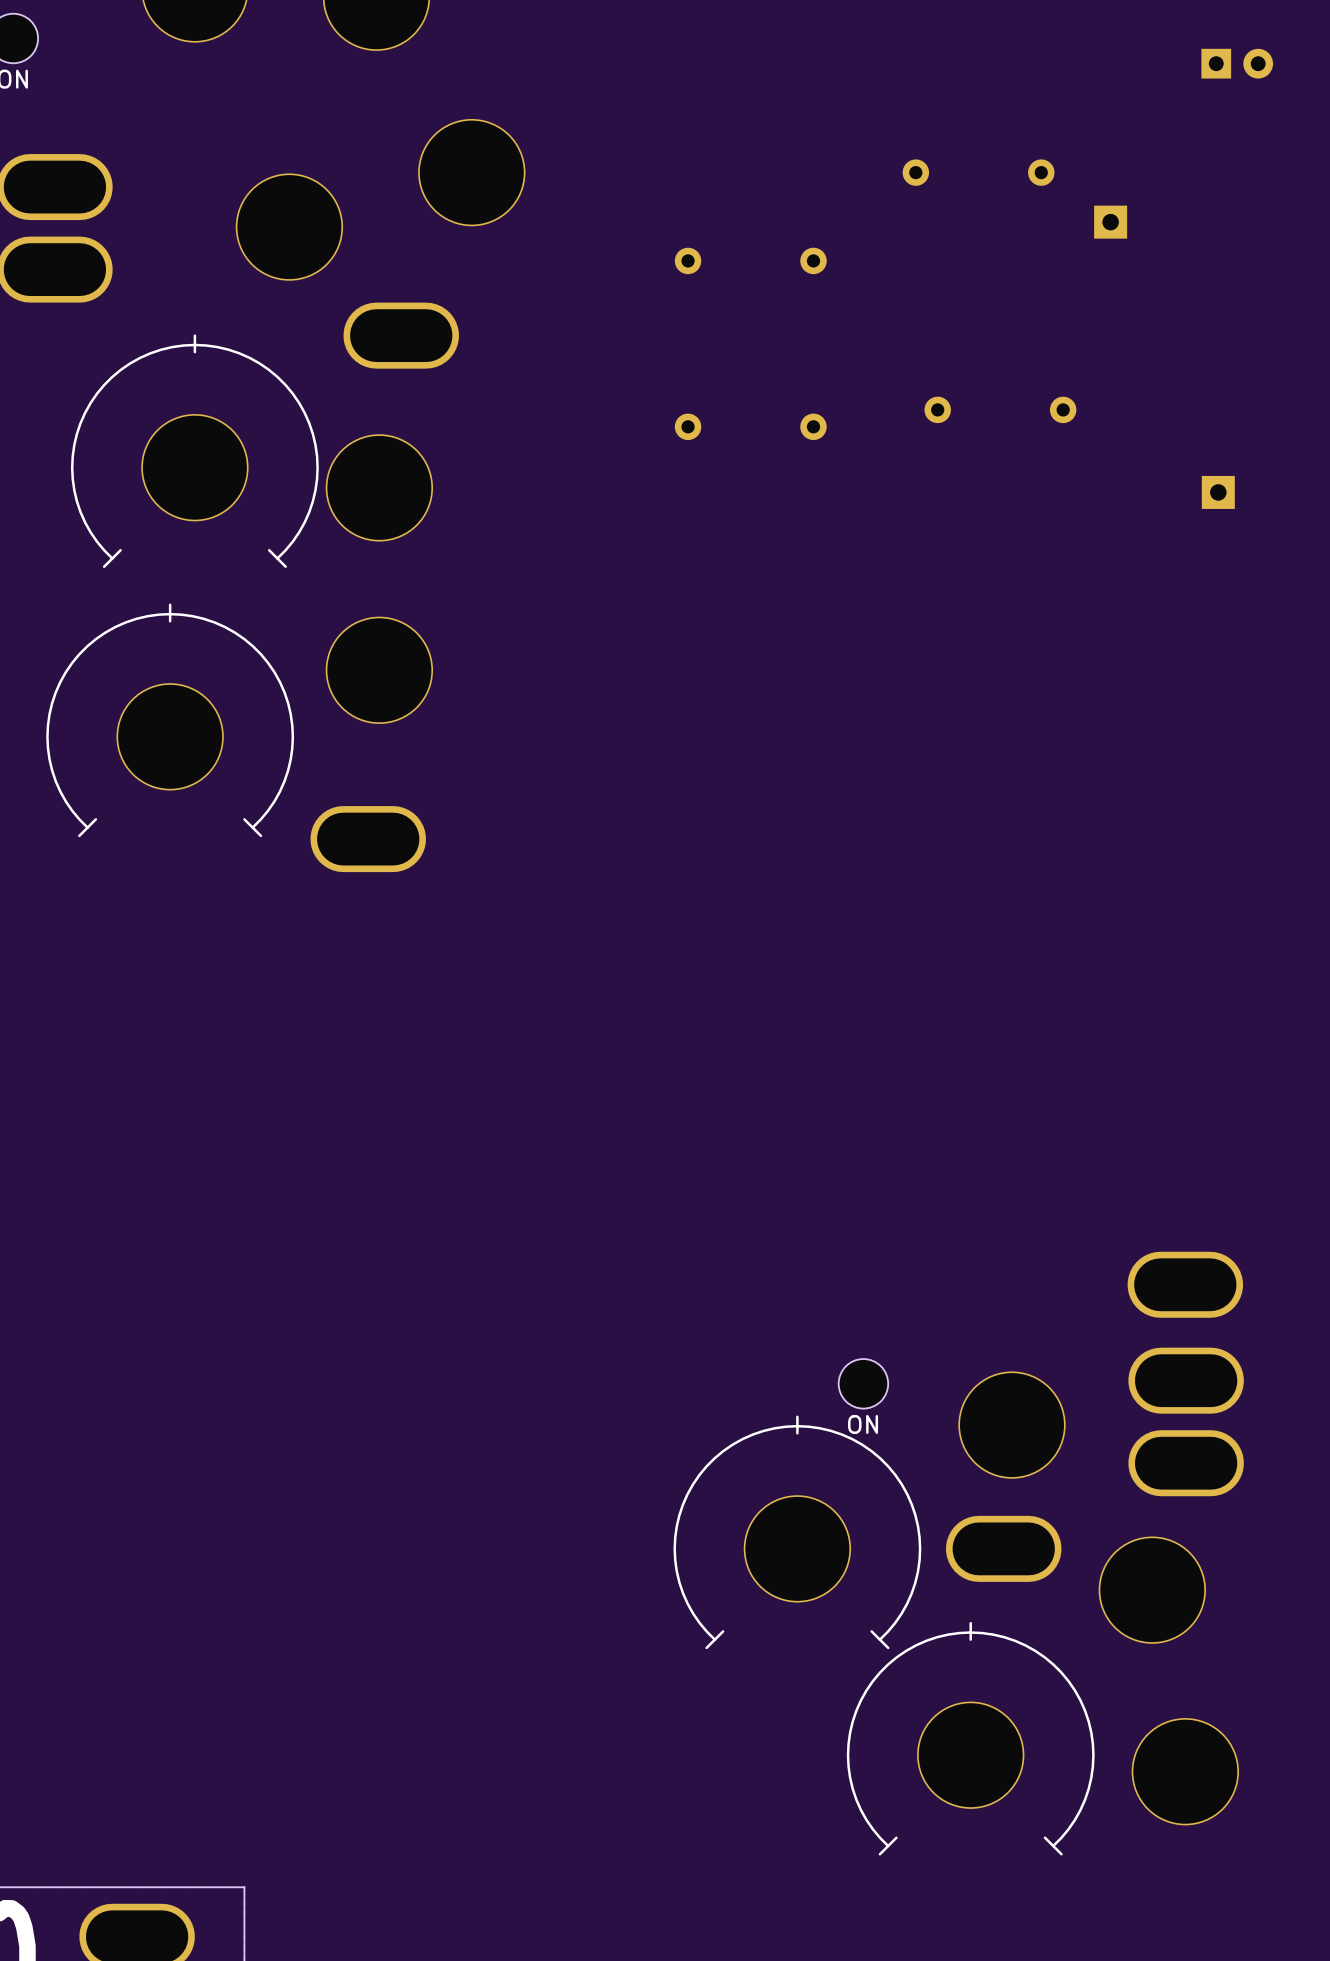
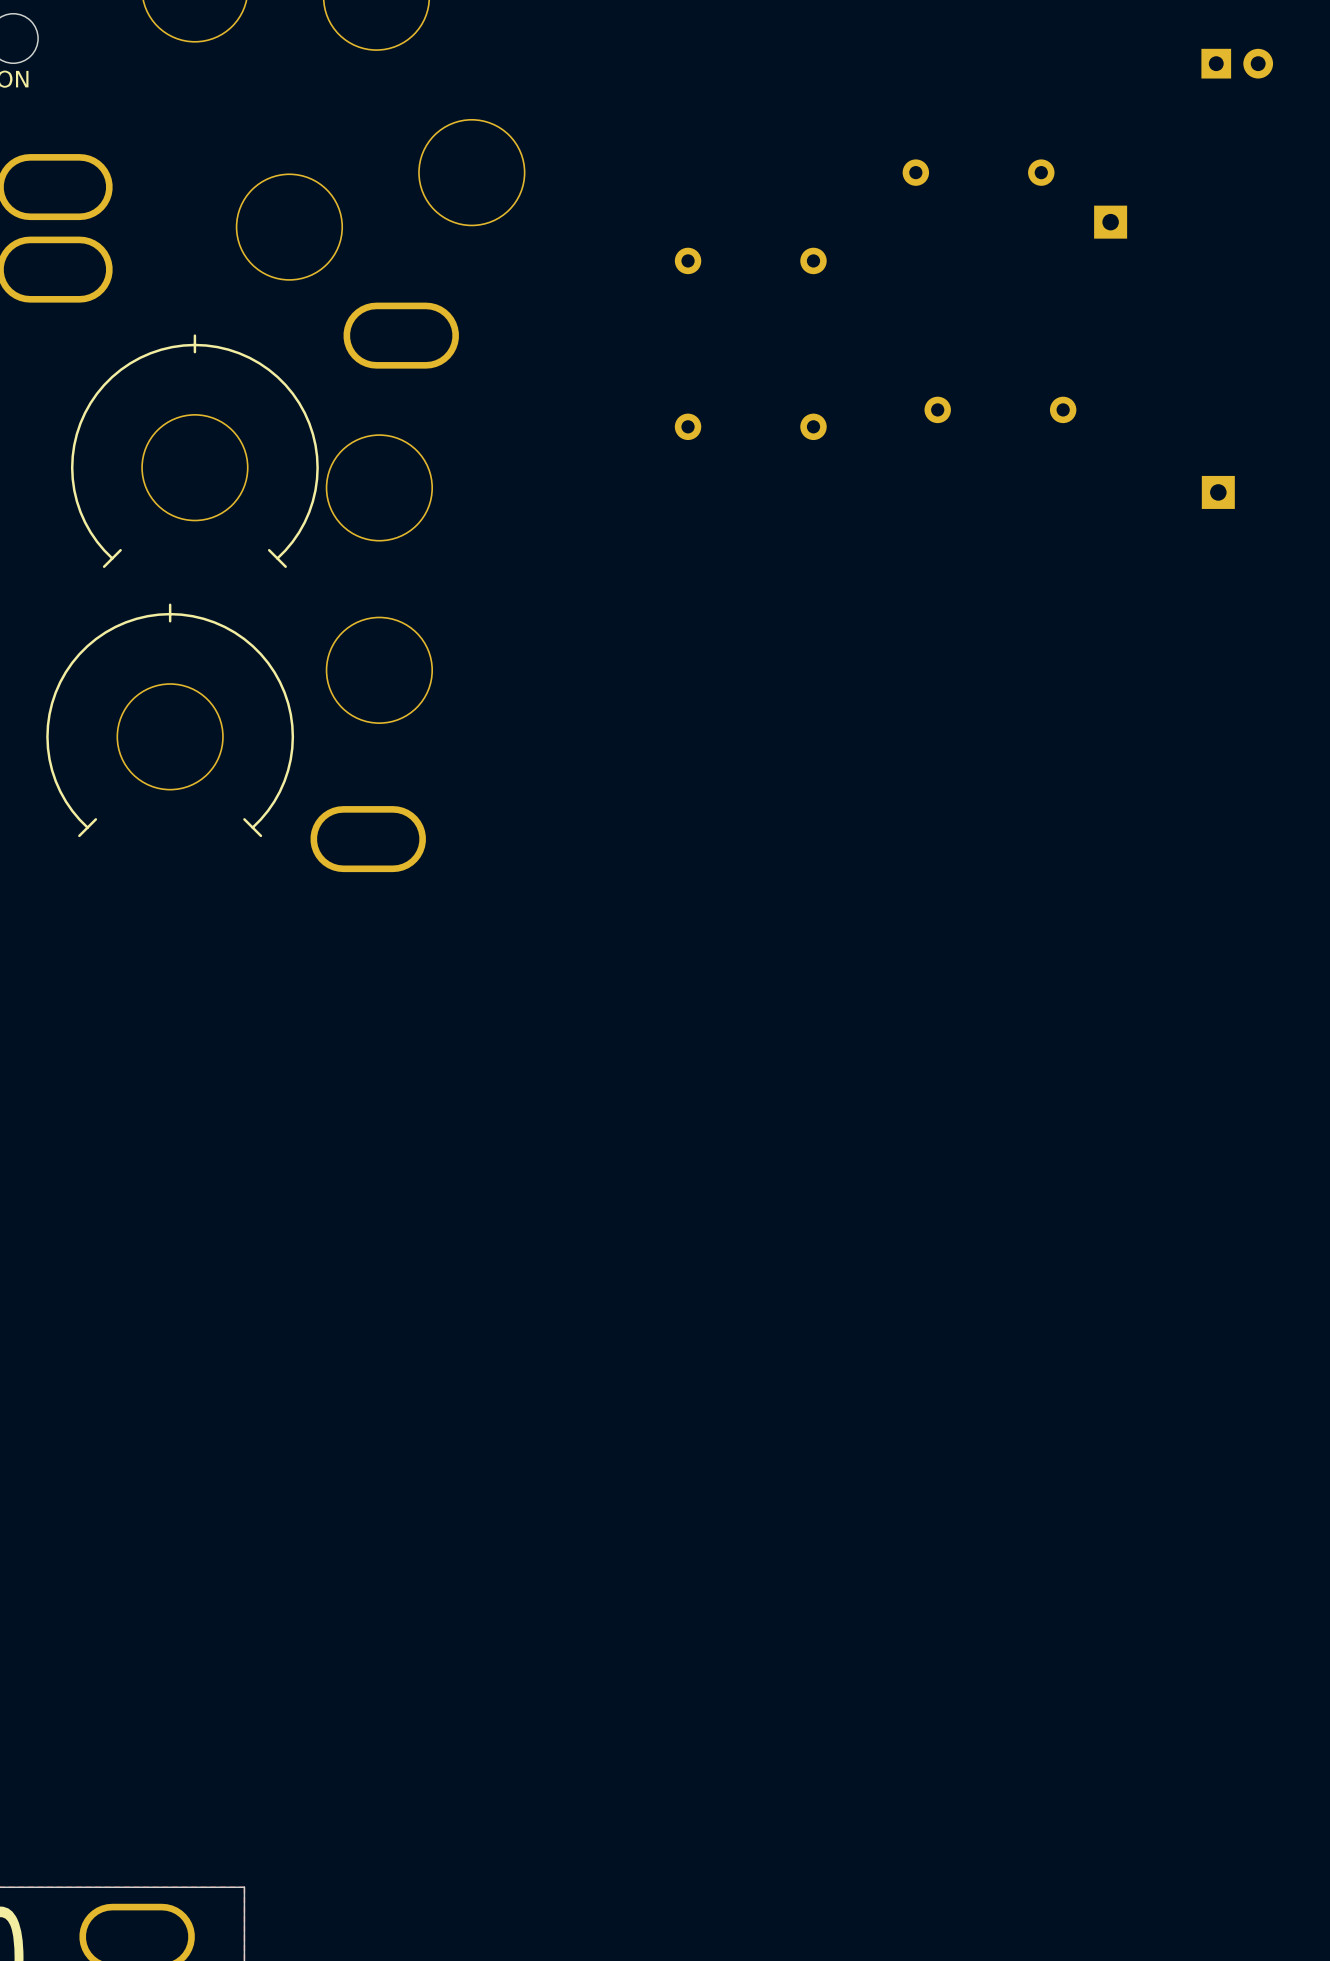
part: (1185, 1284) -> none
part: (1186, 1380) -> none
part: ON (863, 1383) -> none
part: (1011, 1425) -> none
part: (1186, 1463) -> none
part: (797, 1532) -> none
part: (1003, 1548) -> none
part: (1152, 1590) -> none
part: (970, 1738) -> none
part: (1185, 1771) -> none

